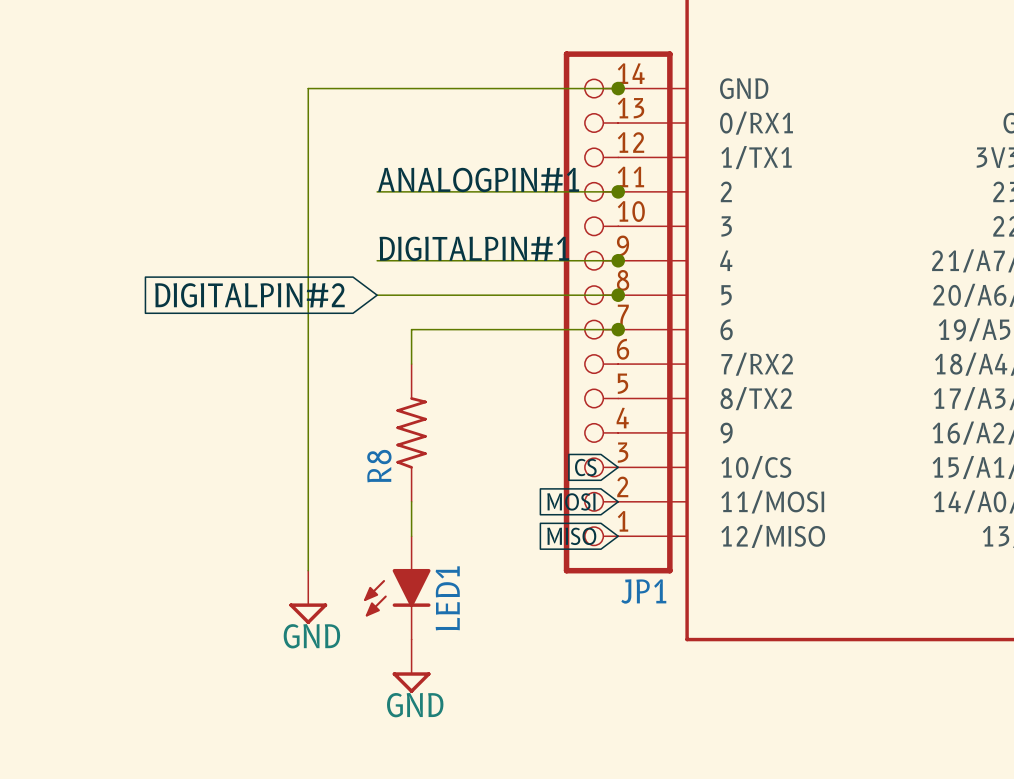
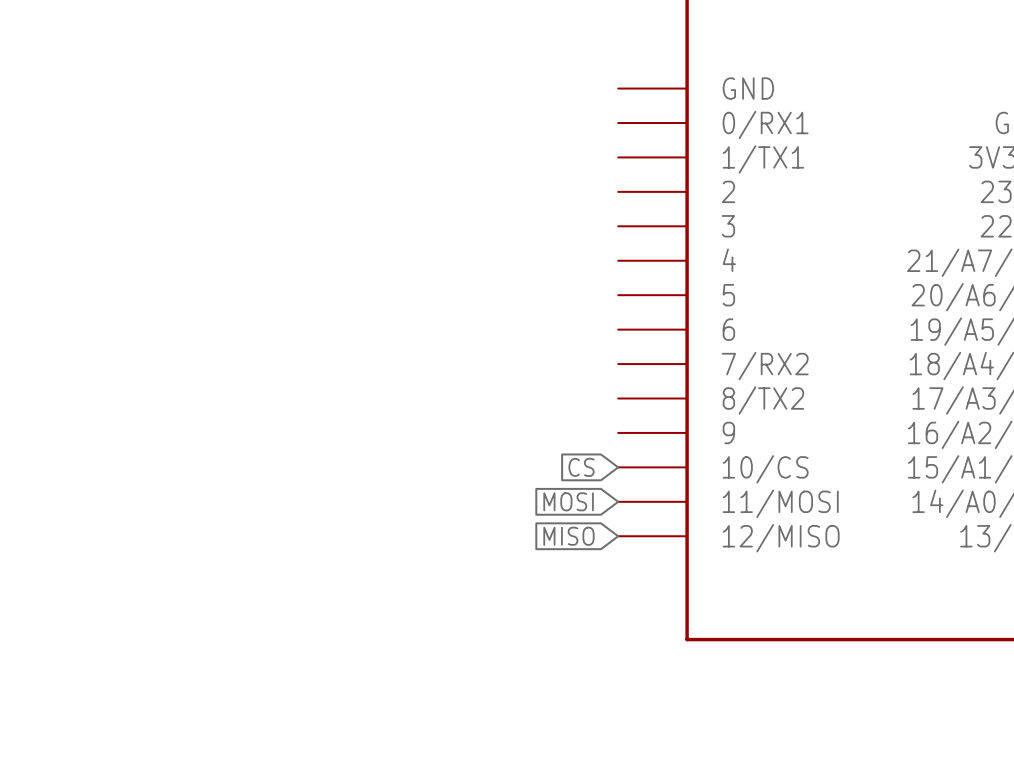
wire: (618, 88) (308, 88) (308, 570) -> none
junction: (618, 88) -> none
label: ANALOGPIN#1 (478, 179) -> none
wire: (377, 191) (618, 191) -> none
junction: (618, 191) -> none
label: DIGITALPIN#1 (474, 248) -> none
wire: (377, 260) (618, 260) -> none
junction: (618, 260) -> none
global label: DIGITALPIN#2 (249, 295) -> none
wire: (377, 295) (618, 295) -> none
junction: (618, 295) -> none
JP1: (618, 312) -> none
wire: (618, 329) (411, 329) (411, 364) -> none
junction: (618, 329) -> none
R8: (411, 432) -> none
wire: (411, 501) (411, 536) -> none
LED1: (397, 587) -> none
power symbol: GND (308, 597) -> none
power symbol: GND (411, 666) -> none

